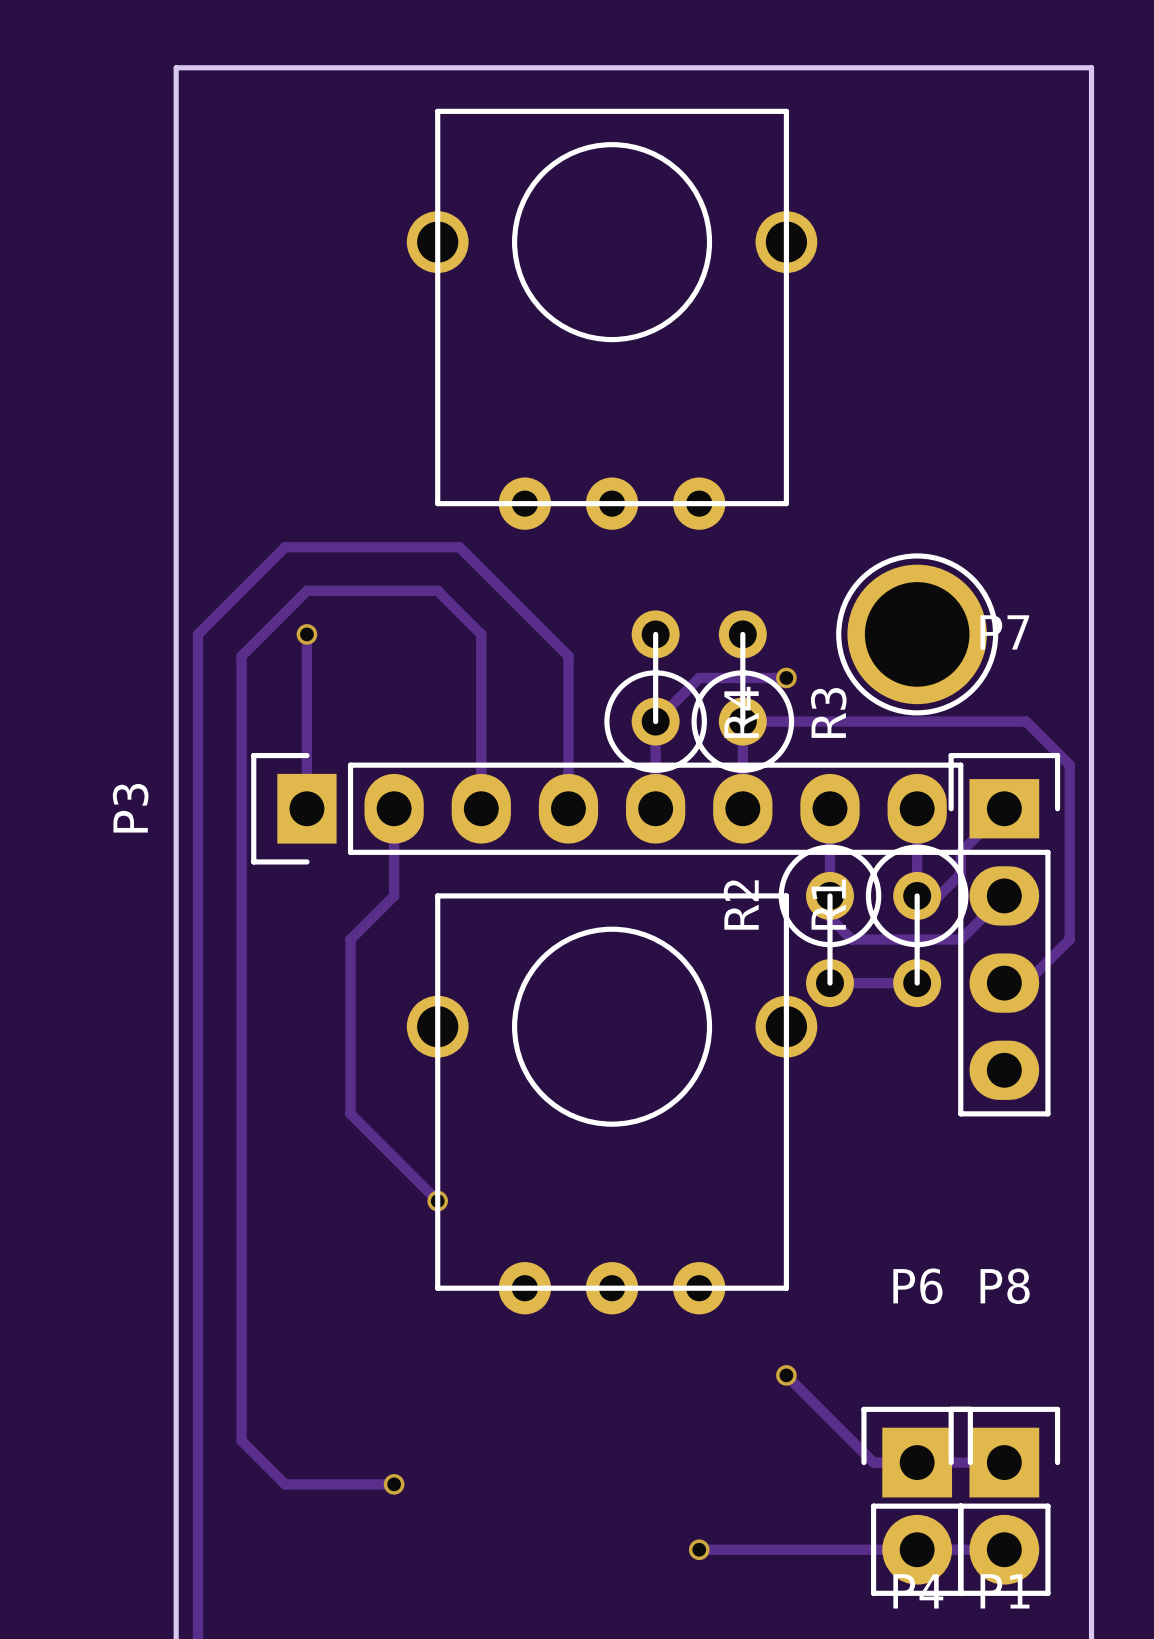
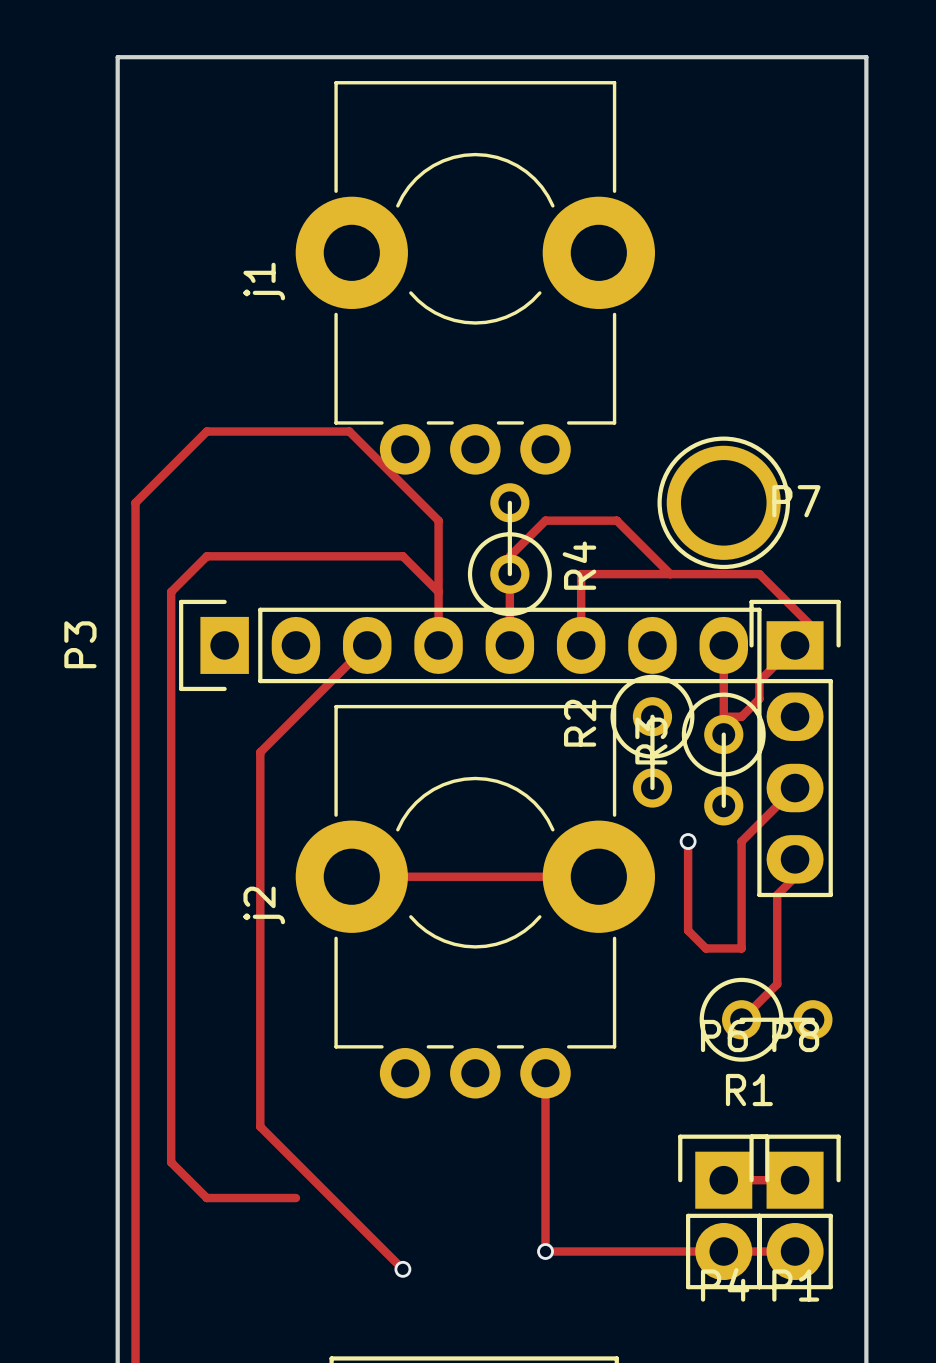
board edge: (176, 89) (176, 67) (1091, 67) (1091, 89) -> (117, 57) (866, 57)
part: (612, 319) -> none
j1: none -> (475, 277)
track: (306, 634) (306, 808) -> none
via: (306, 634) -> none
track: (786, 677) (699, 677) (655, 721) -> (670, 574) (616, 520) (545, 520) (509, 556) (509, 574)
via: (786, 677) -> none
R3 rotation: 0° (742, 691) -> 180° (723, 759)
R3 position: (742, 691) -> (723, 759)
track: (960, 721) (1026, 721) (1069, 765) (1069, 939) (1026, 983) -> (759, 574) (812, 627) (812, 645)
track: (241, 743) (241, 656) (306, 590) (437, 590) (481, 634) (481, 808) -> (171, 591) (206, 556) (402, 556) (438, 591)
track: (394, 808) (394, 895) -> (367, 645) (295, 716)
track: (829, 808) (829, 917) (851, 939) (960, 939) (1004, 895) -> none
R1 rotation: 0° (917, 925) -> 90° counterclockwise (766, 1019)
R1 position: (917, 925) -> (766, 1019)
track: (829, 983) (917, 983) -> none
track: none -> (795, 788) (741, 841) (741, 948) (705, 948) (688, 930) (688, 841)
via: none -> (688, 841)
track: none -> (812, 859) (777, 894) (777, 984) (741, 1019)
track: none -> (351, 876) (598, 876)
part: (612, 1103) -> none
track: (350, 1113) (437, 1201) -> (260, 894) (260, 1126) (402, 1269)
j2: none -> (475, 901)
via: (437, 1201) -> none
track: none -> (545, 1073) (545, 1251)
track: (786, 1375) (873, 1462) (917, 1462) -> none
via: (786, 1375) -> none
via position: (394, 1484) -> (402, 1269)

